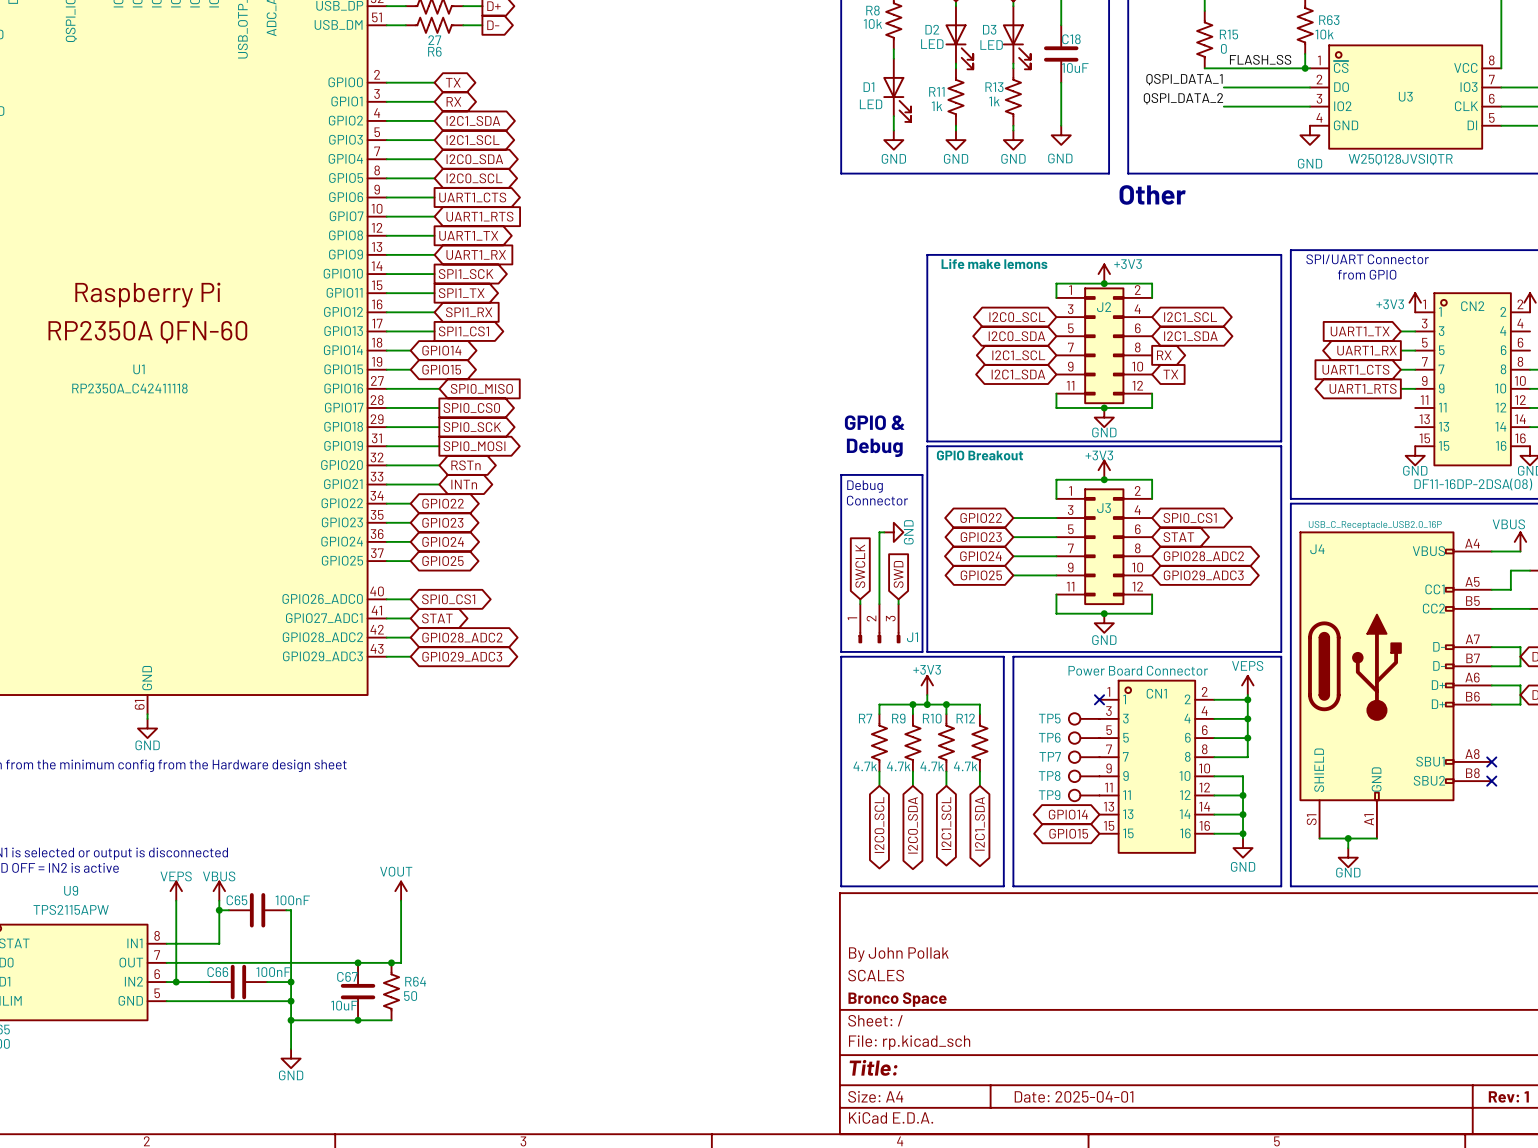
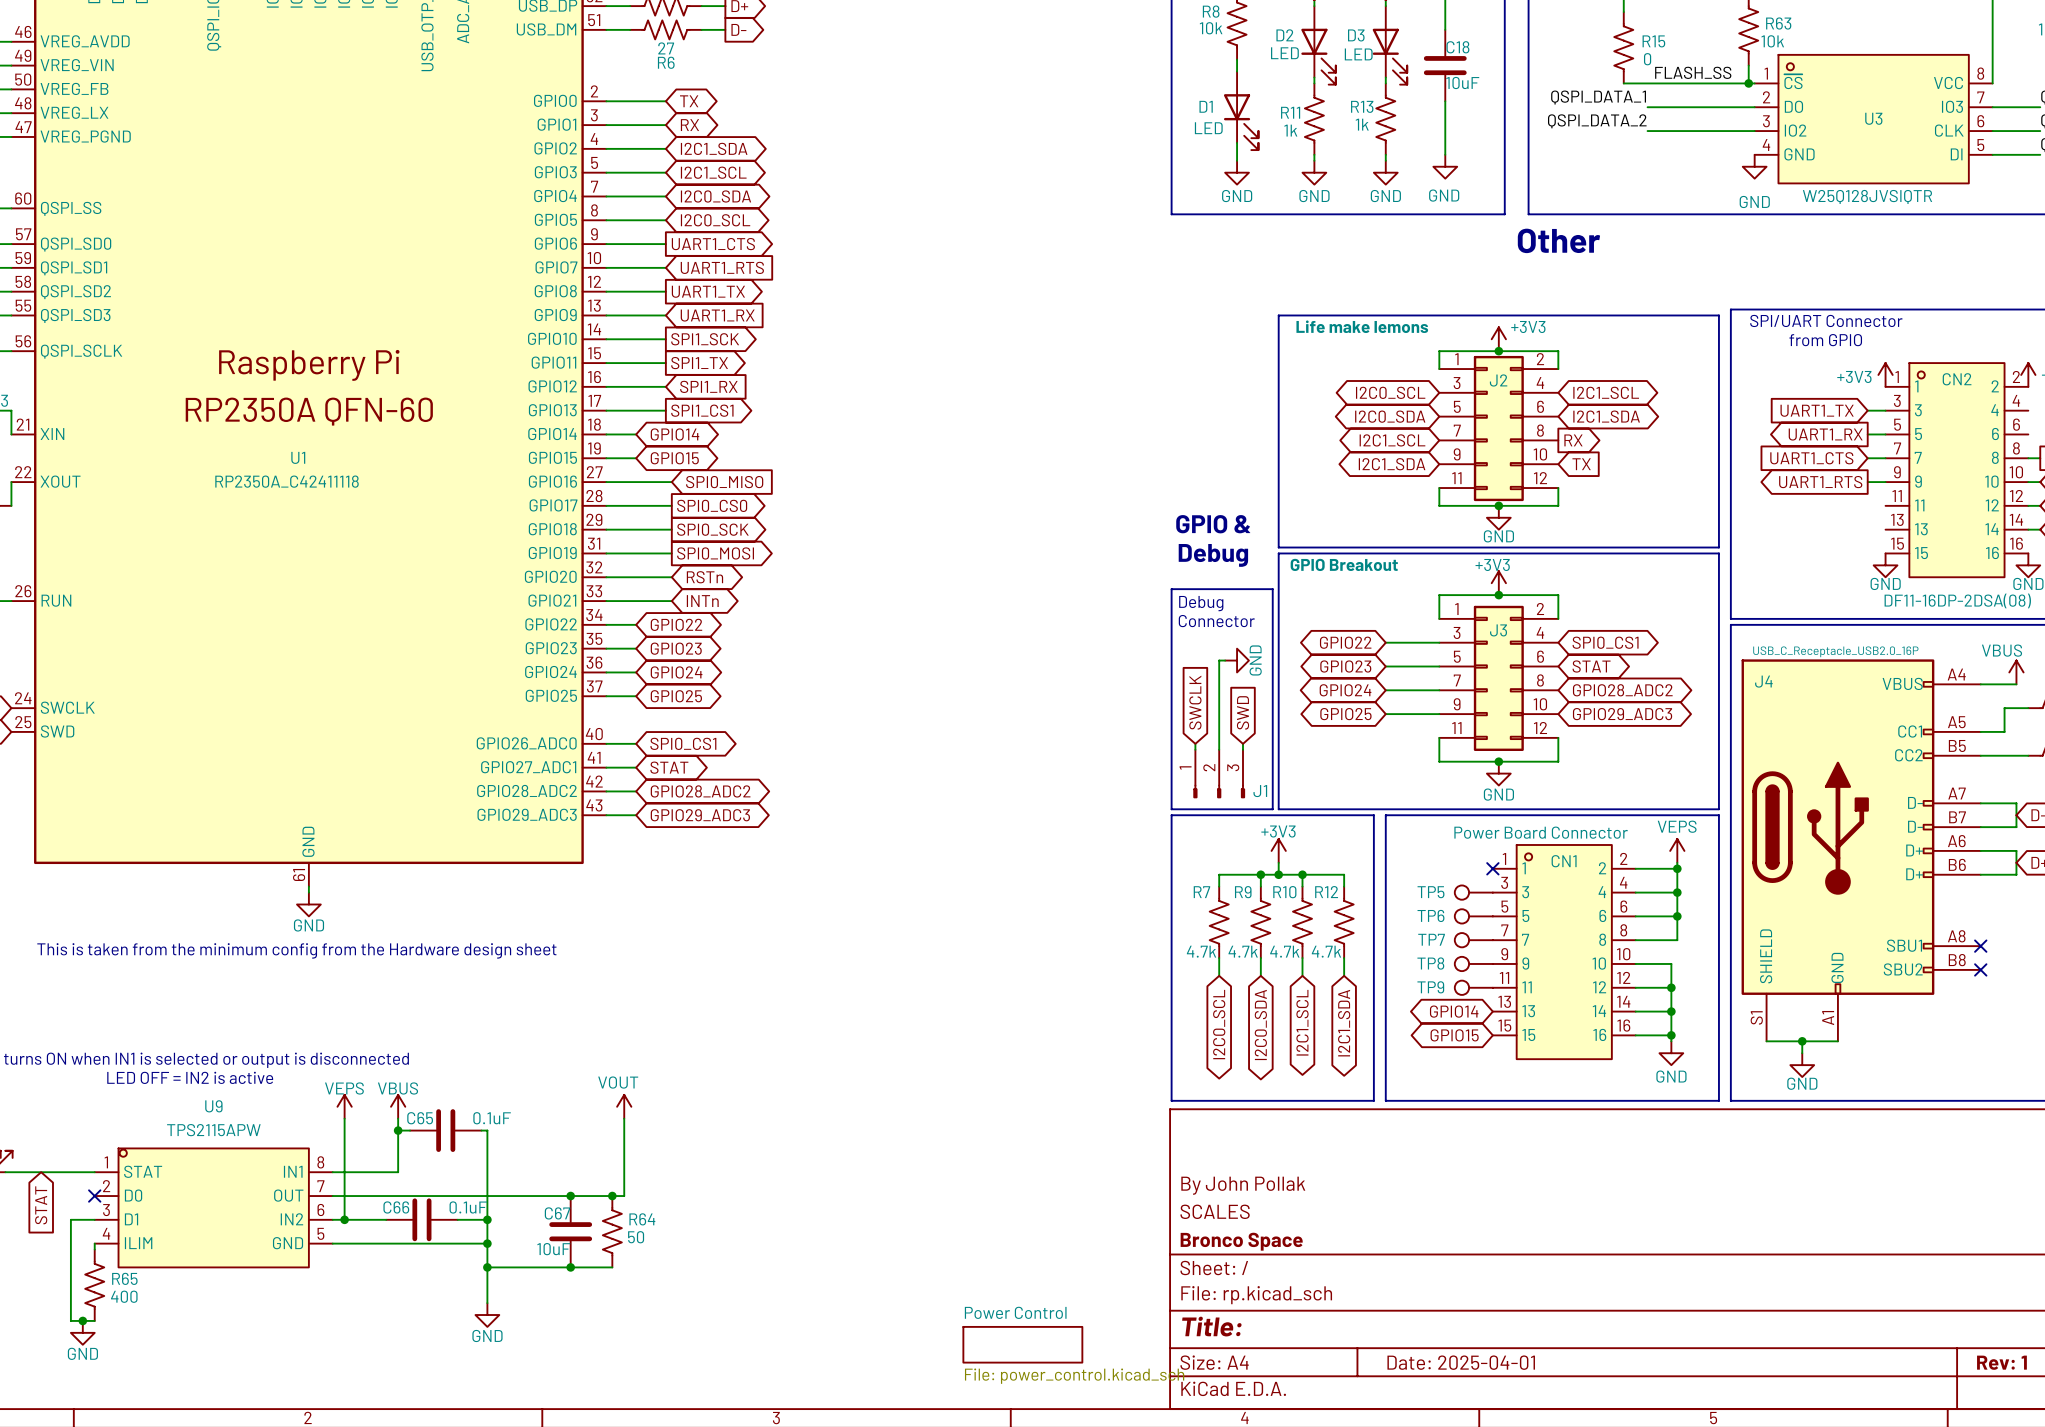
C65 value: 100nF (292, 900) -> 0.1uF (492, 1118)
C66 value: 100nF (273, 972) -> 0.1uF (468, 1207)
sheet Power Control: none -> File: power_control.kicad_sch (1022, 1344)

